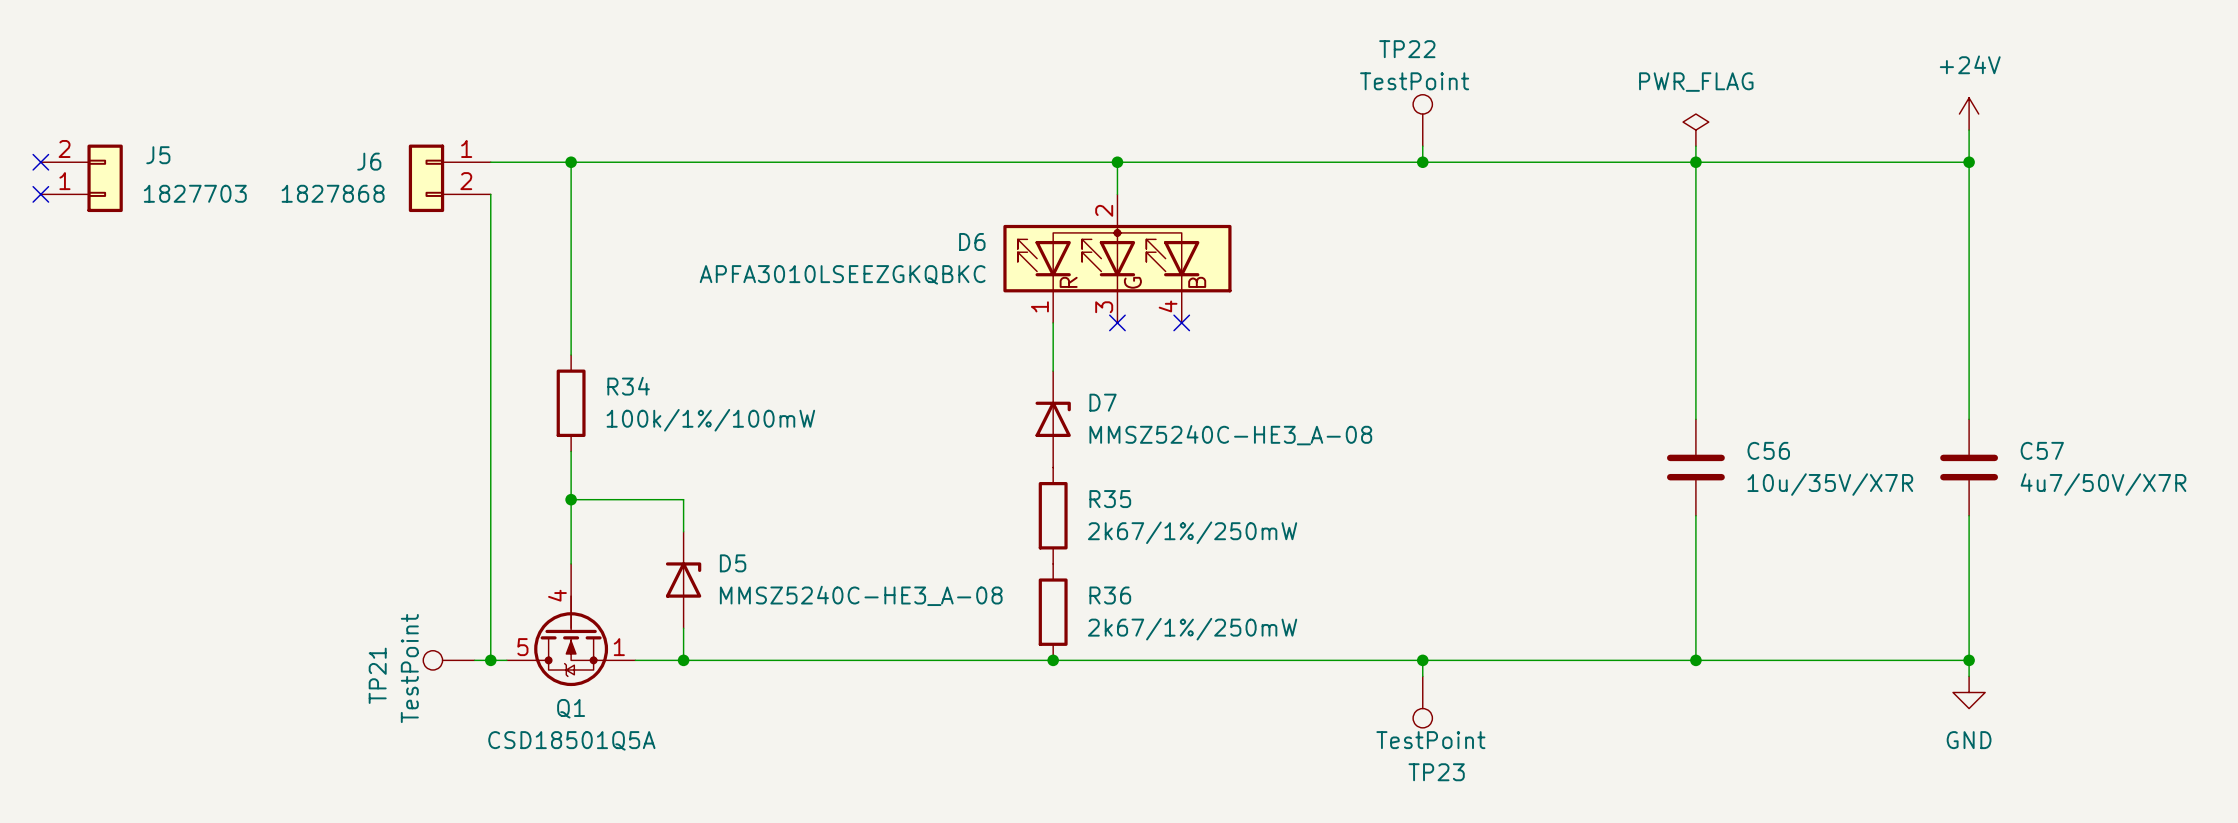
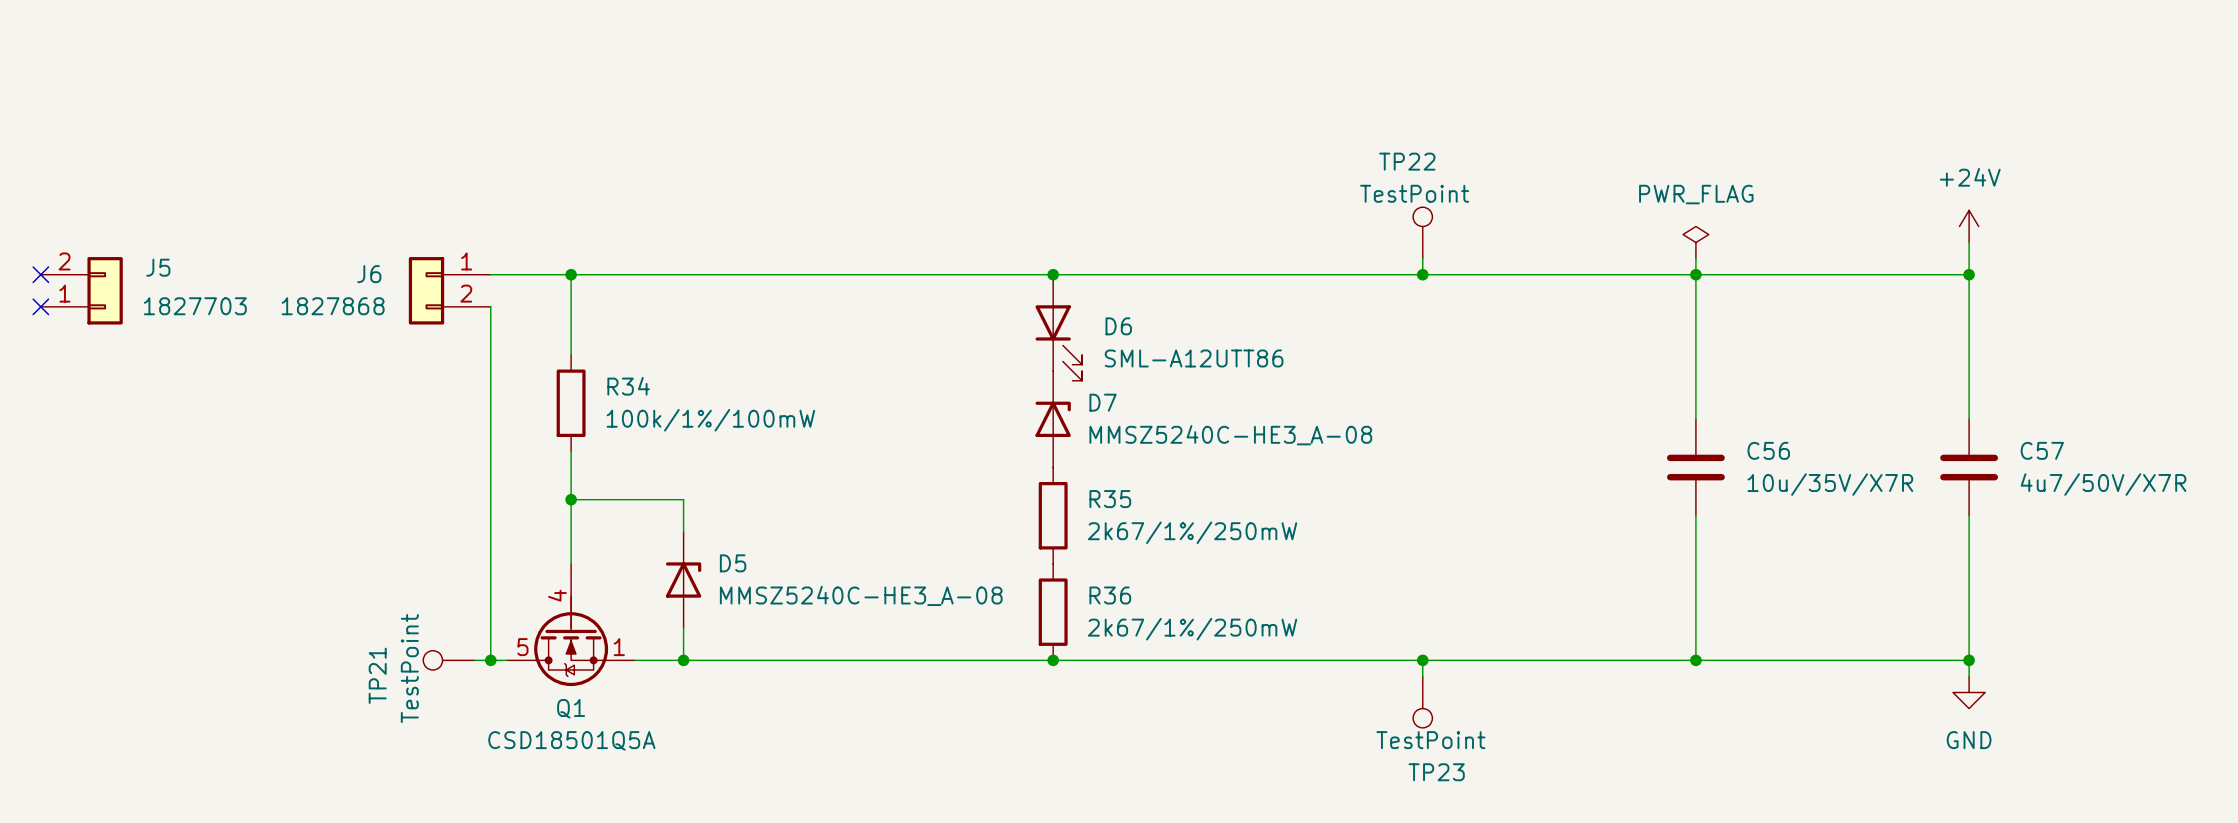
power symbol position: +24V (1969, 114) -> +24V (1969, 226)
TP22 position: (1422, 120) -> (1422, 232)
power symbol position: PWR_FLAG (1695, 130) -> PWR_FLAG (1695, 242)
wire: (1969, 130) (1969, 242) -> none
wire: (1422, 146) (1422, 162) -> (1422, 258) (1422, 274)
wire: (1695, 146) (1695, 258) -> none
no-connect mark: (40, 162) -> none
wire: (490, 162) (1969, 162) -> (490, 274) (1969, 274)
wire: (571, 162) (571, 274) -> none
junction: (571, 162) -> none
wire: (1117, 162) (1117, 194) -> none
junction: (1117, 162) -> none
junction: (1422, 162) -> none
junction: (1695, 162) -> none
junction: (1969, 162) -> none
J5 position: (81, 178) -> (81, 290)
J6 position: (449, 178) -> (449, 290)
no-connect mark: (40, 194) -> none
wire: (490, 194) (490, 306) -> none
D6 symbol: [1003, 194, 1232, 323] -> [1035, 274, 1083, 381]
D6 name position: D6 (972, 241) -> D6 (1118, 326)
no-connect mark: none -> (40, 274)
junction: none -> (571, 274)
D6 value: APFA3010LSEEZGKQBKC (842, 274) -> SML-A12UTT86 (1194, 358)
junction: none -> (1053, 274)
junction: none -> (1422, 274)
junction: none -> (1695, 274)
junction: none -> (1969, 274)
no-connect mark: none -> (40, 306)
no-connect mark: (1117, 322) -> none
no-connect mark: (1181, 322) -> none

